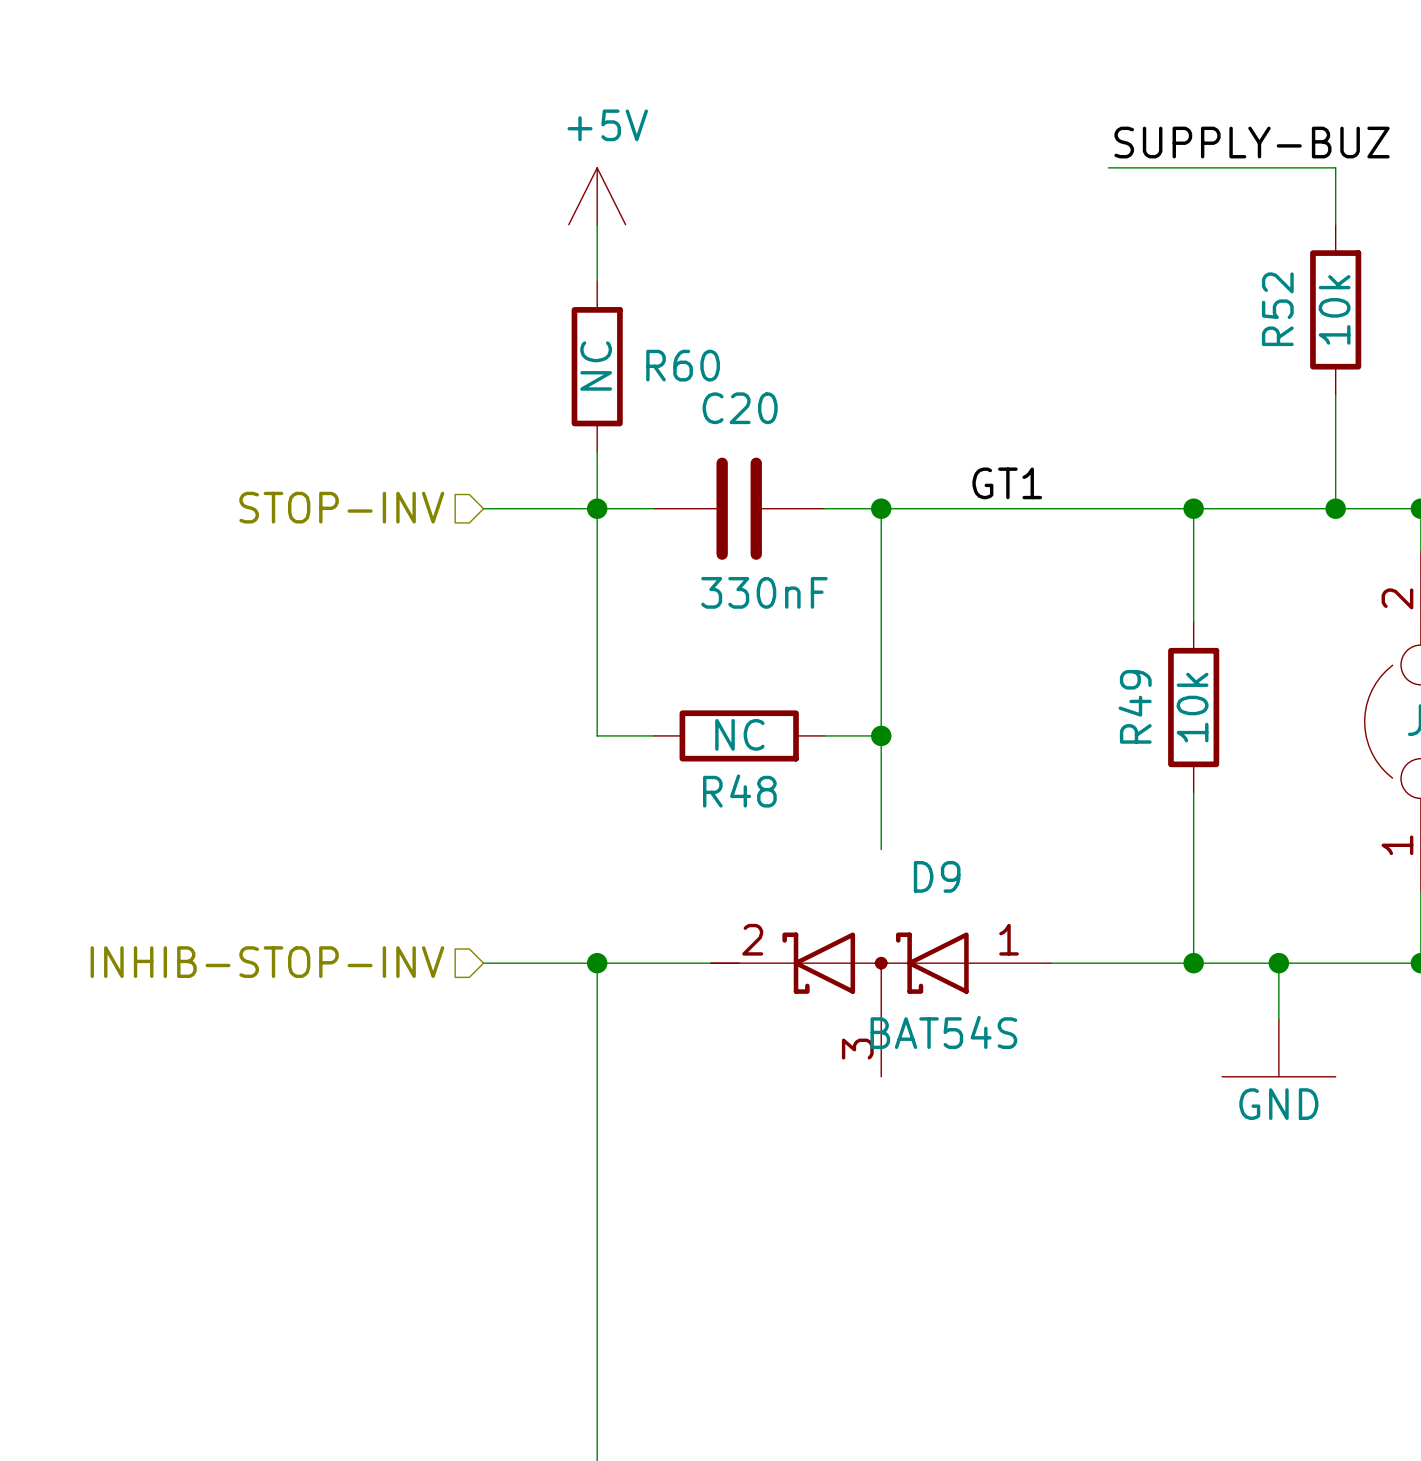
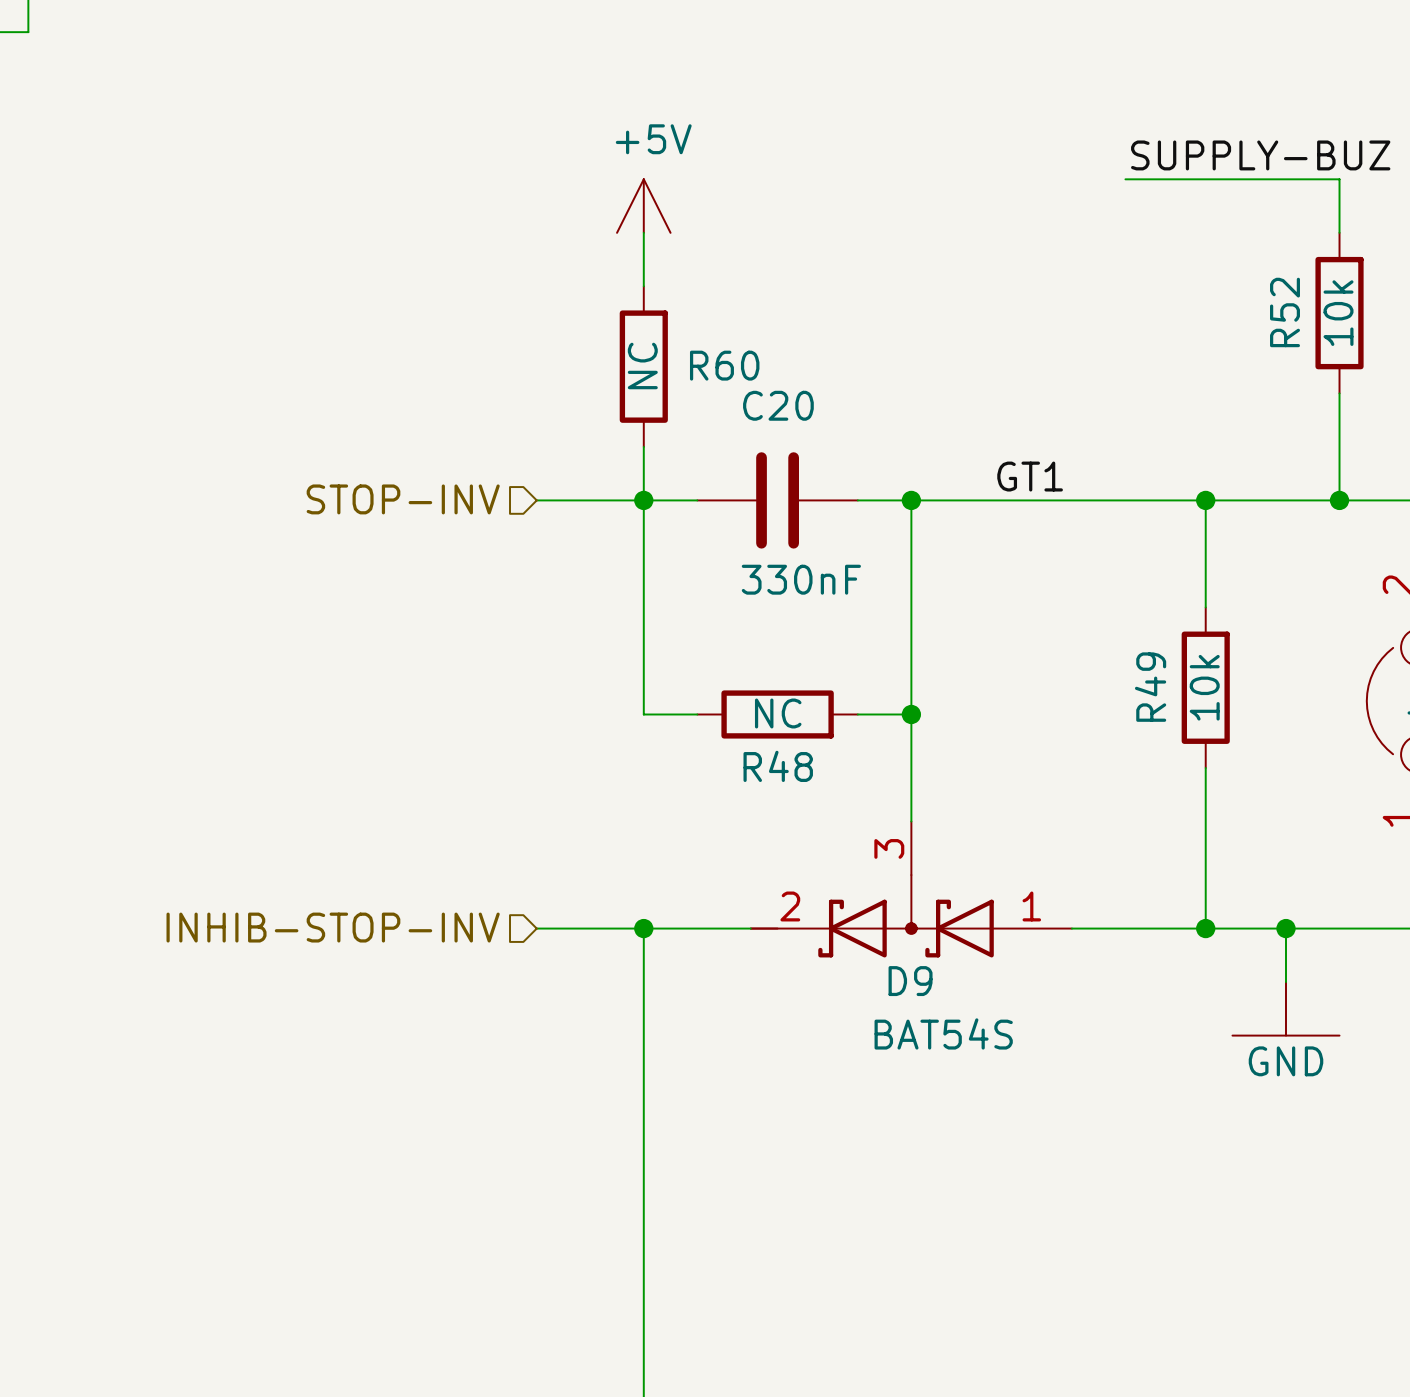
D9 name position: D9 (937, 876) -> D9 (910, 981)
D9 flip: as is (839, 976) -> up-down (872, 916)
D9 value position: BAT54S (943, 1032) -> BAT54S (943, 1033)

